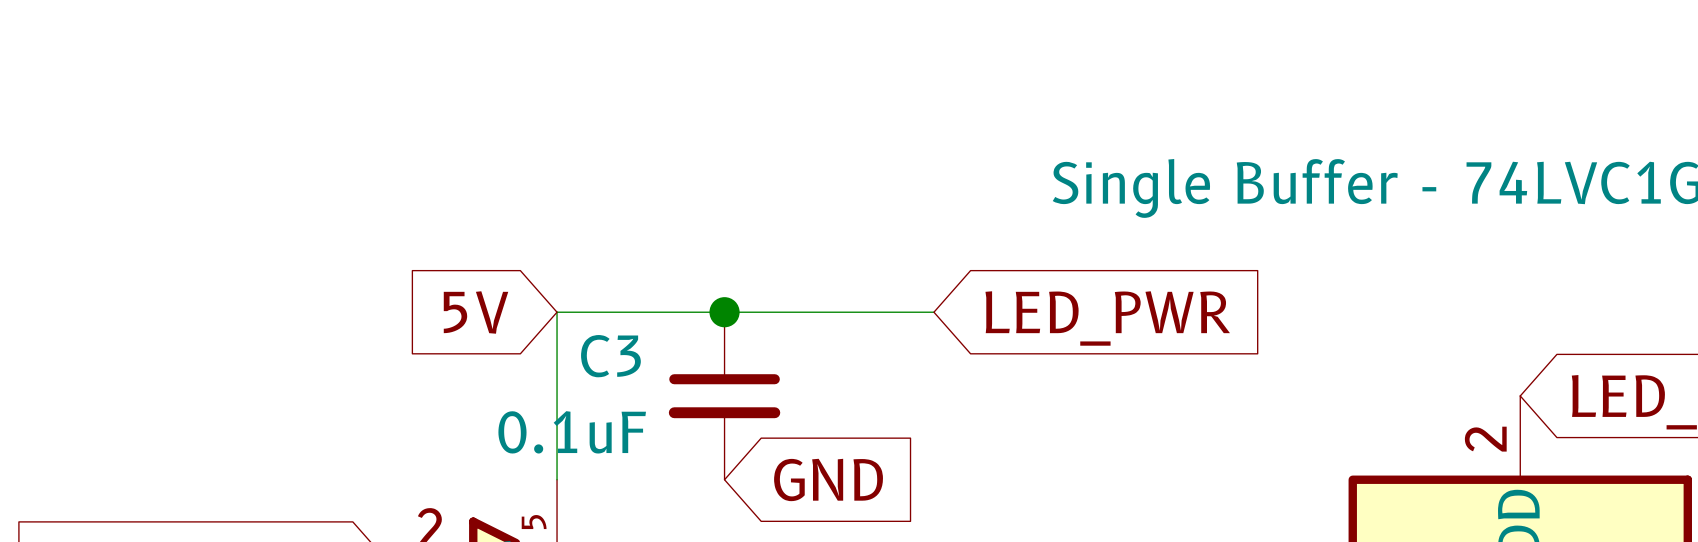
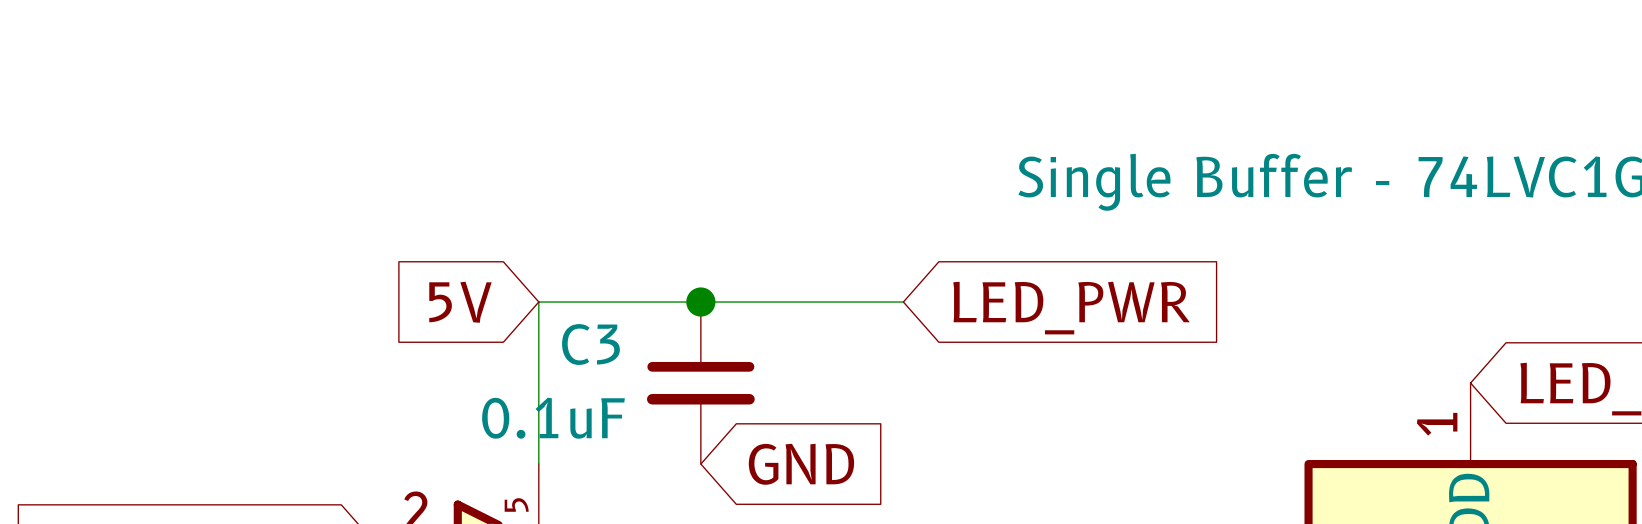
part pin number: 2 (1485, 439) -> 1 (1437, 424)

